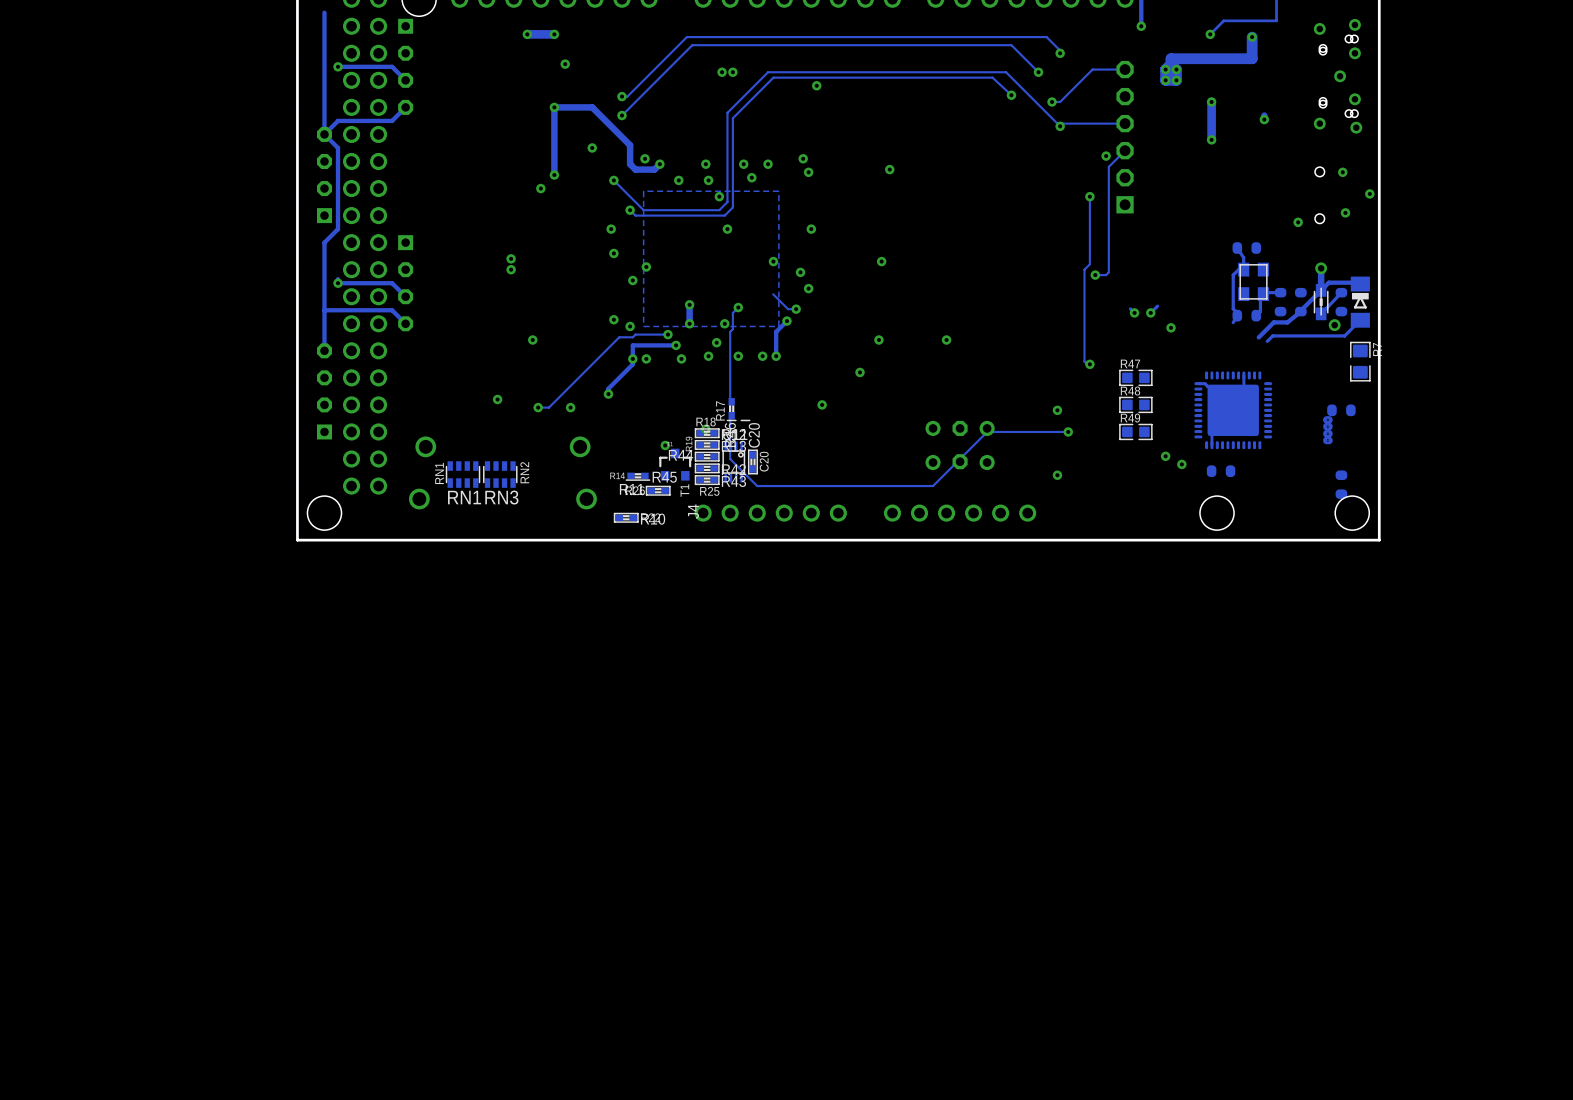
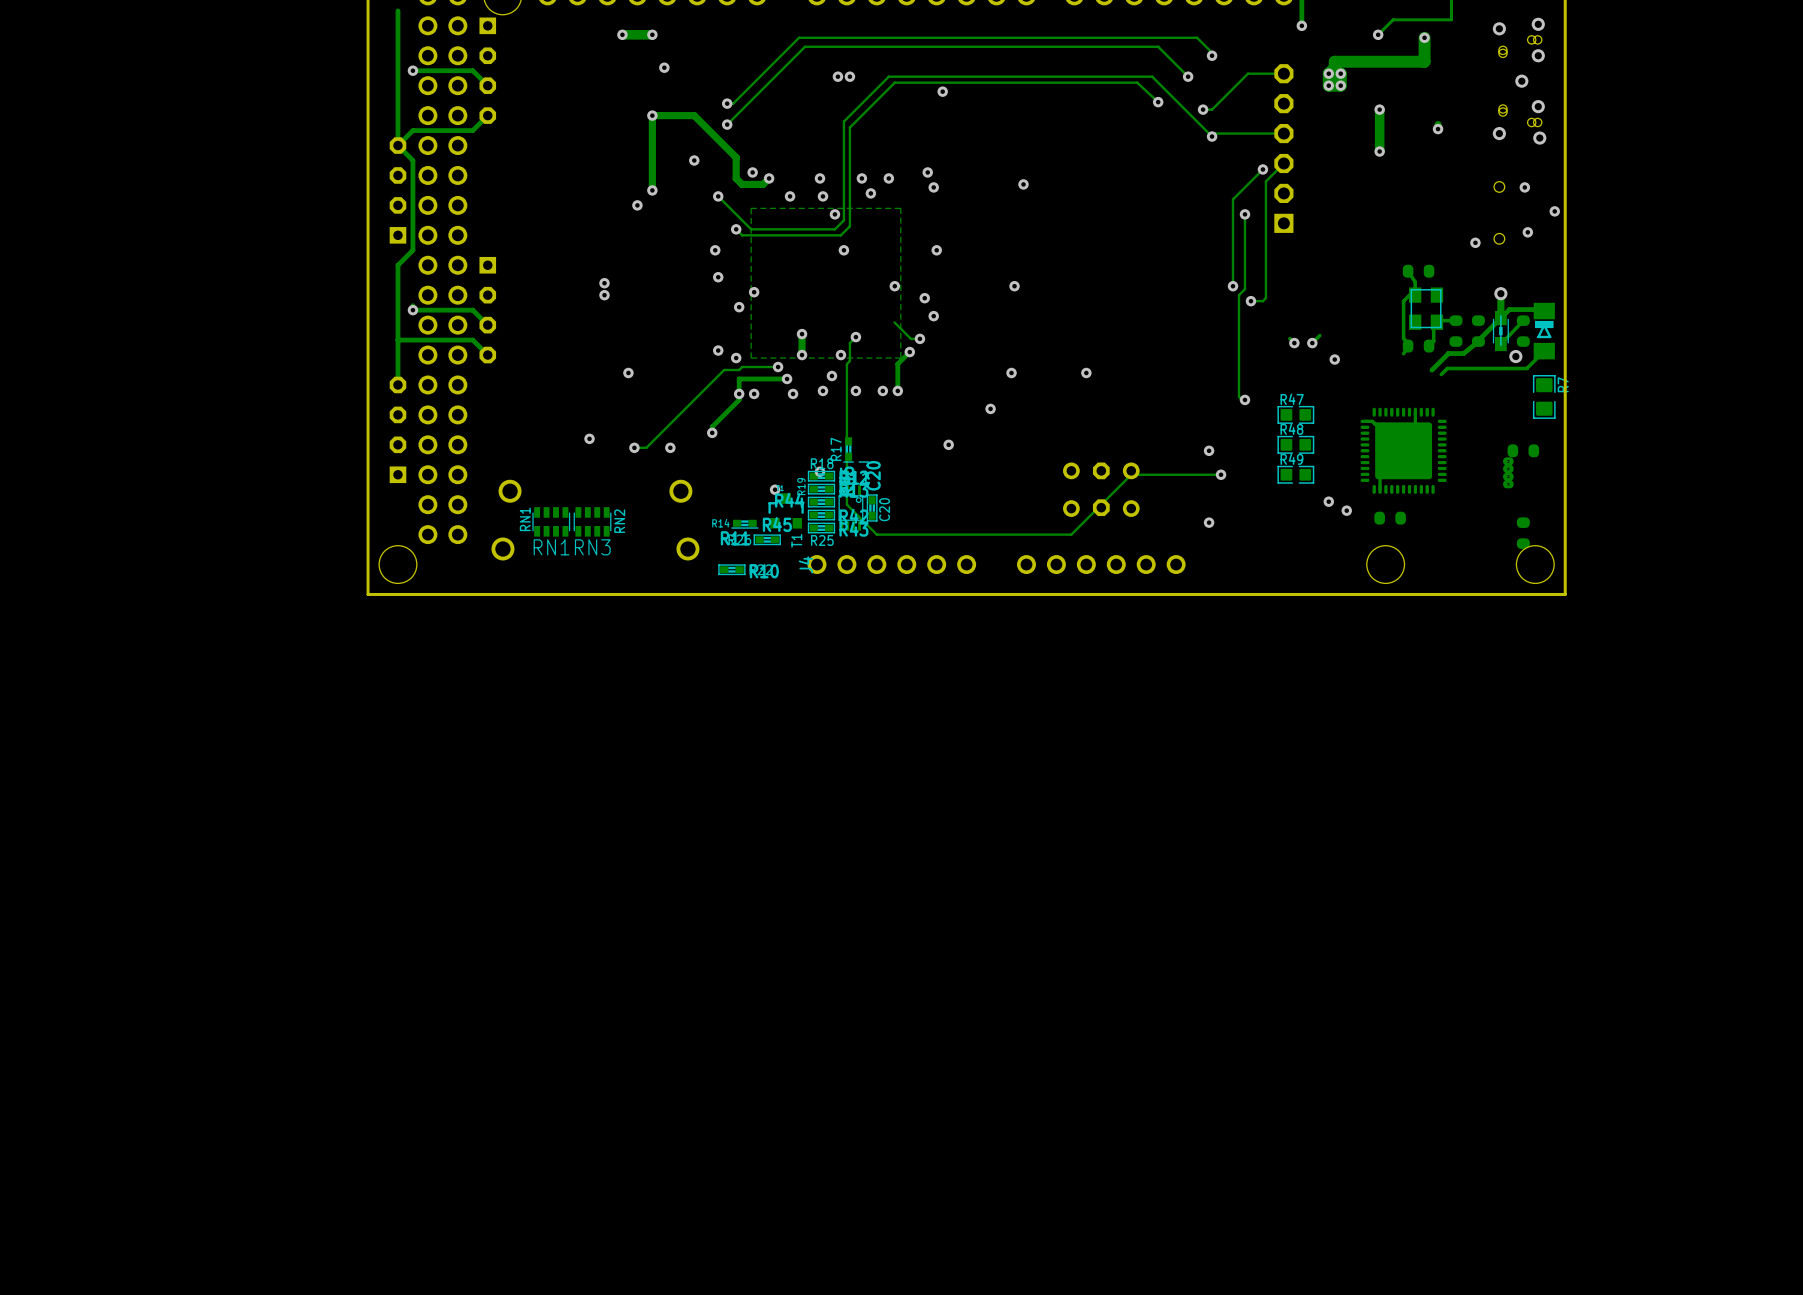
track: none -> (1262, 169) (1233, 199) (1233, 286)
via: none -> (1233, 286)

